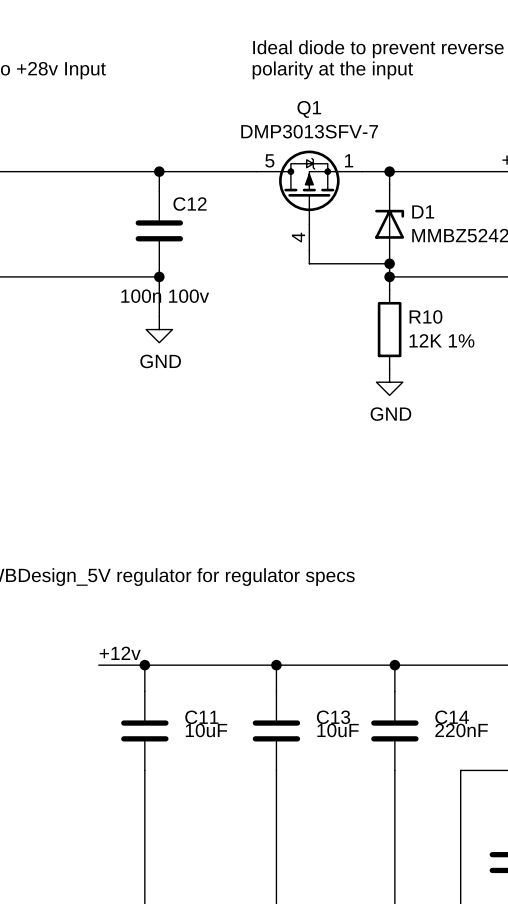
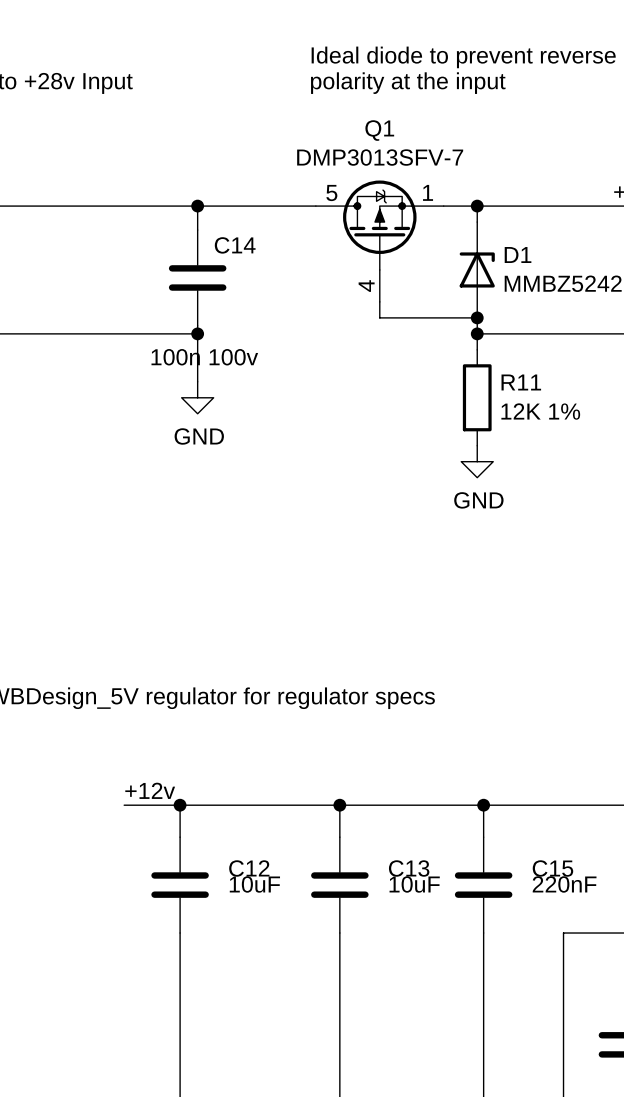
C12 name: C12 (190, 204) -> C14 (235, 245)
R10 name: R10 (426, 316) -> R11 (521, 382)
C11 name: C11 (201, 717) -> C12 (249, 868)
C14 name: C14 (452, 717) -> C15 (552, 868)

